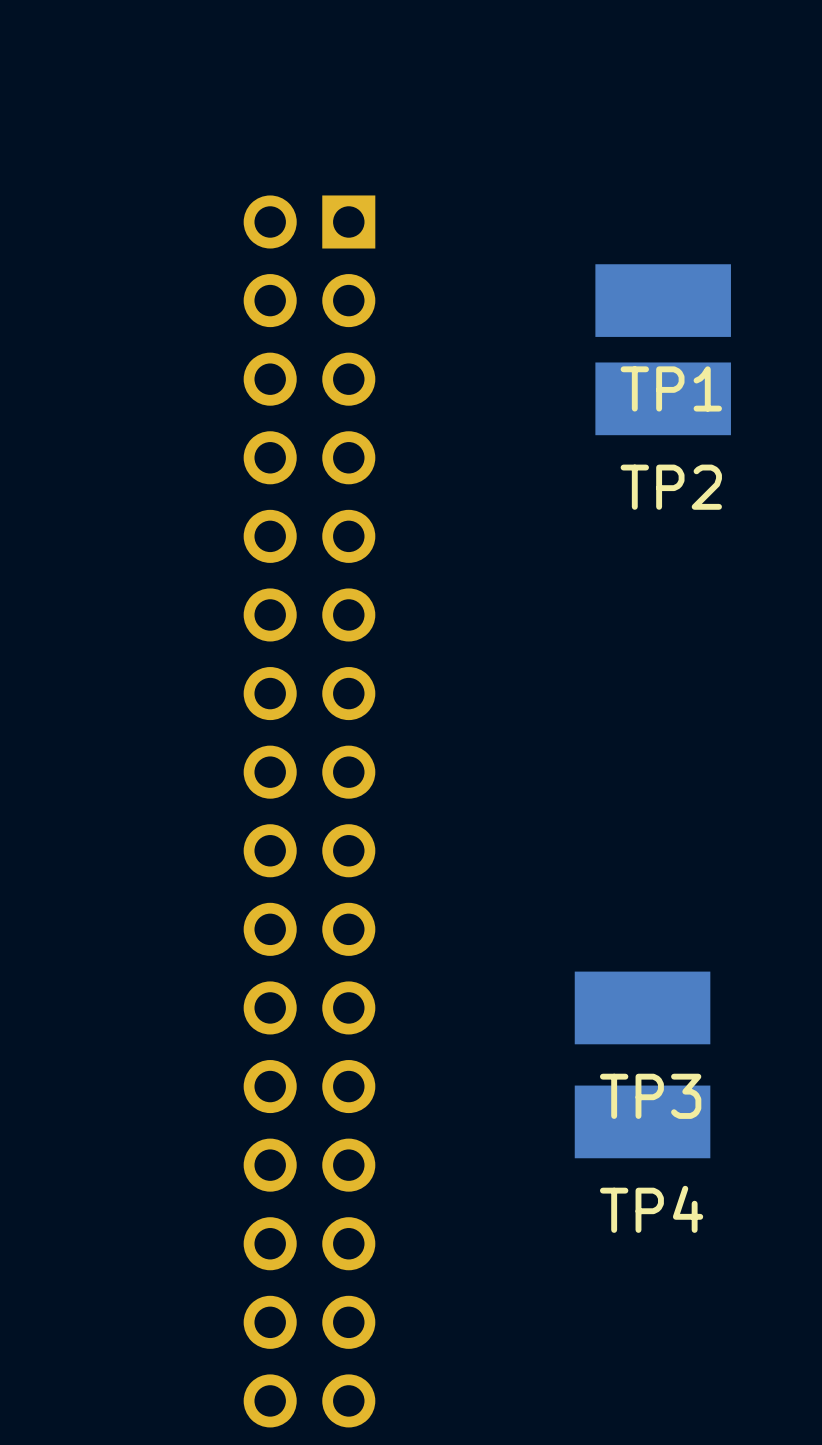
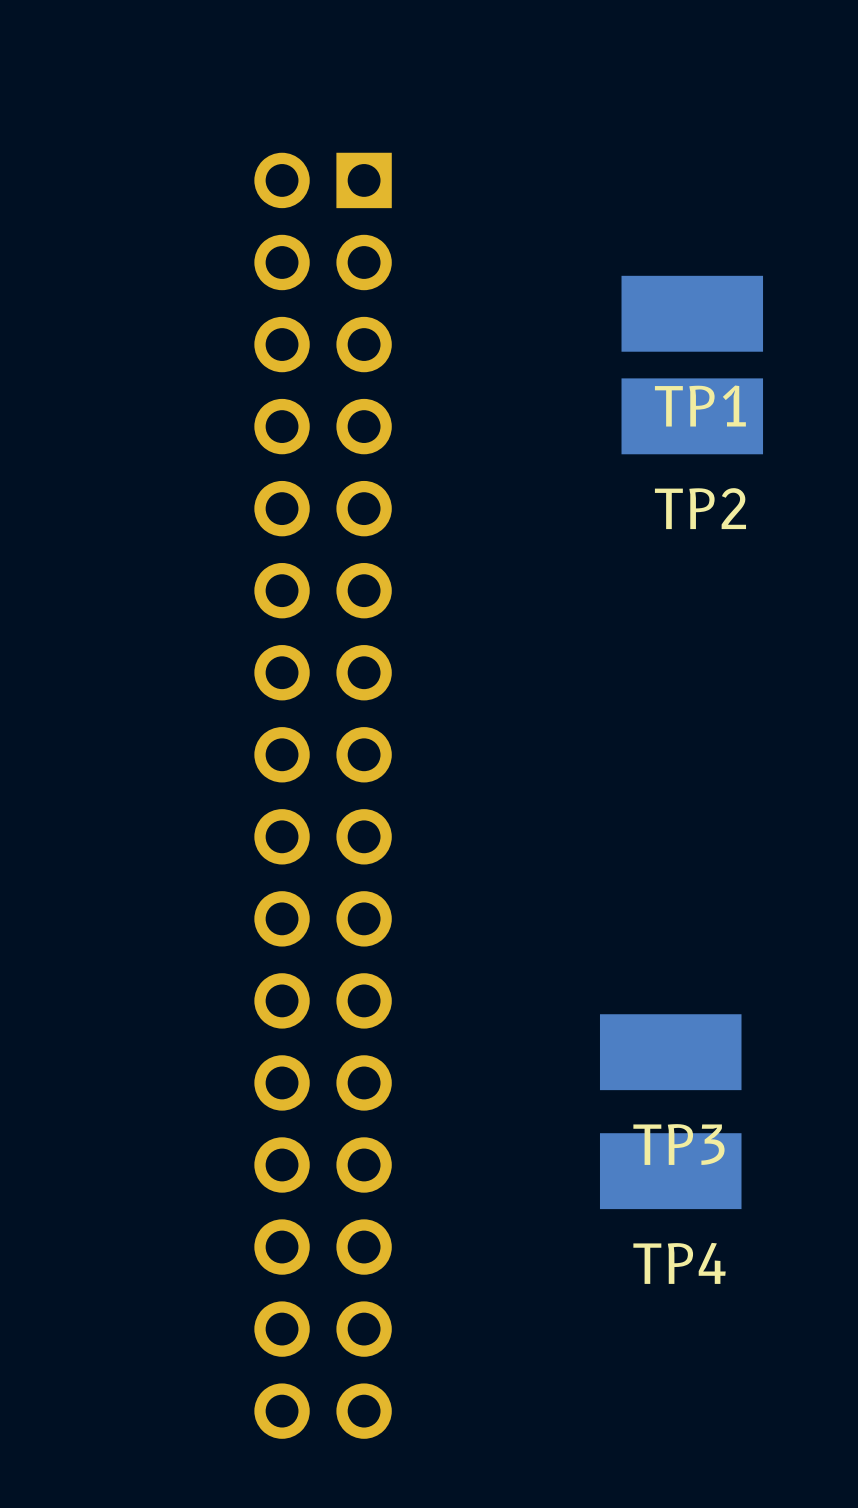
part position: (309, 811) -> (323, 795)

